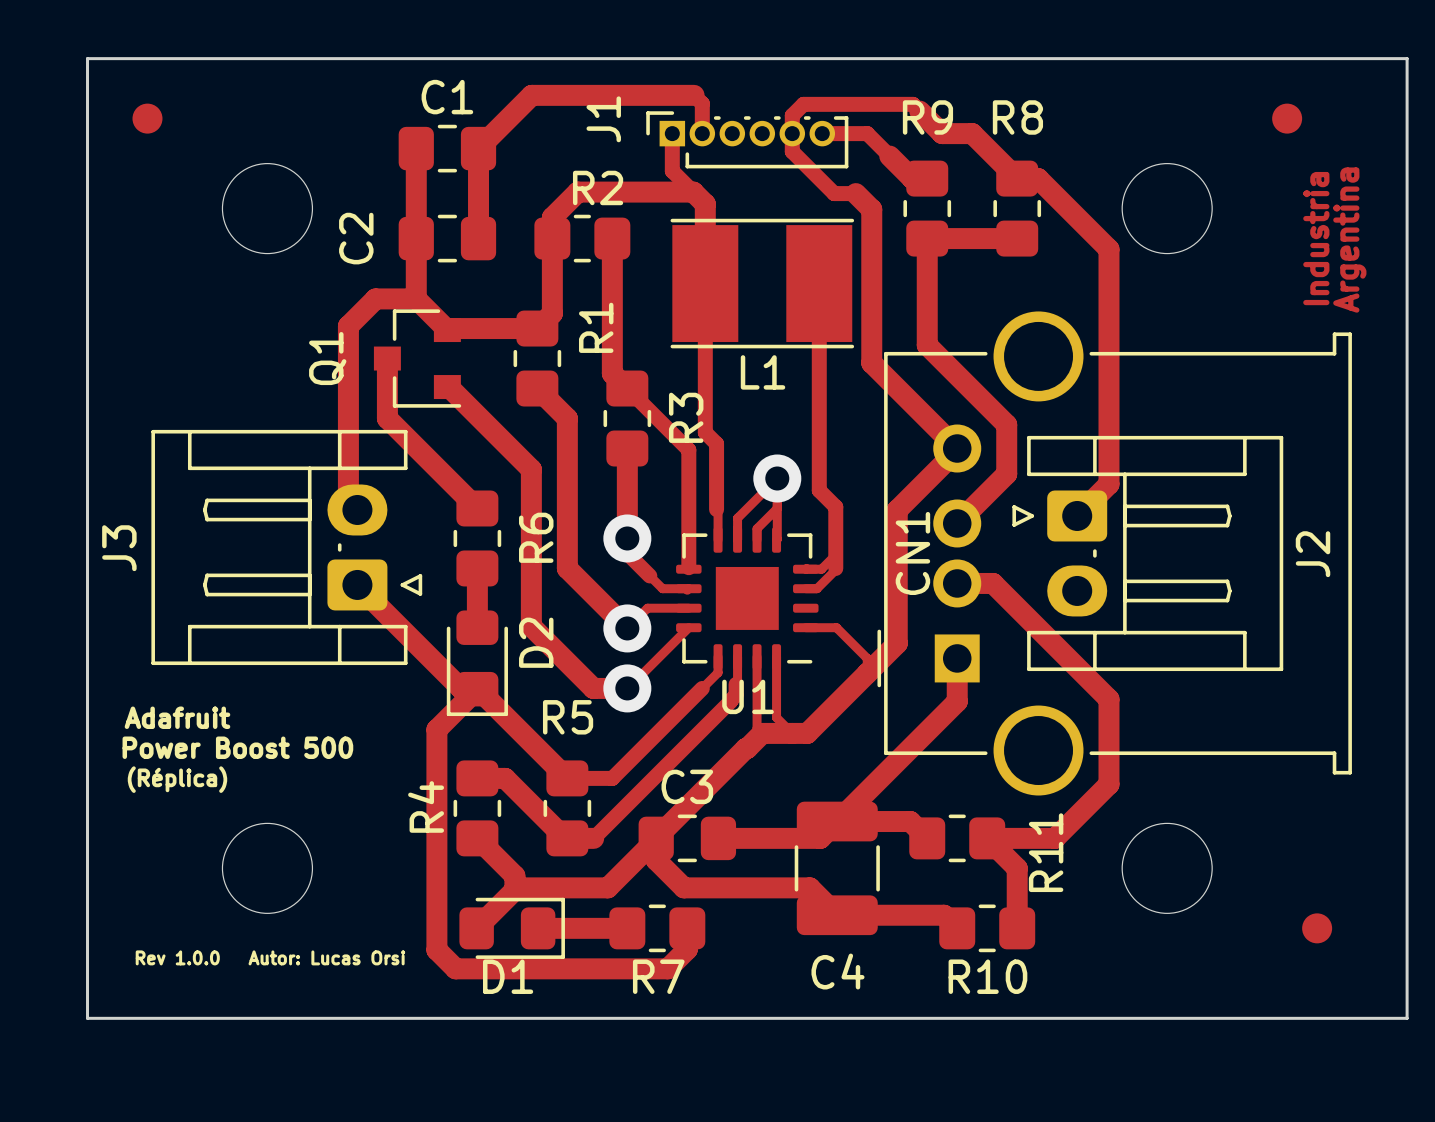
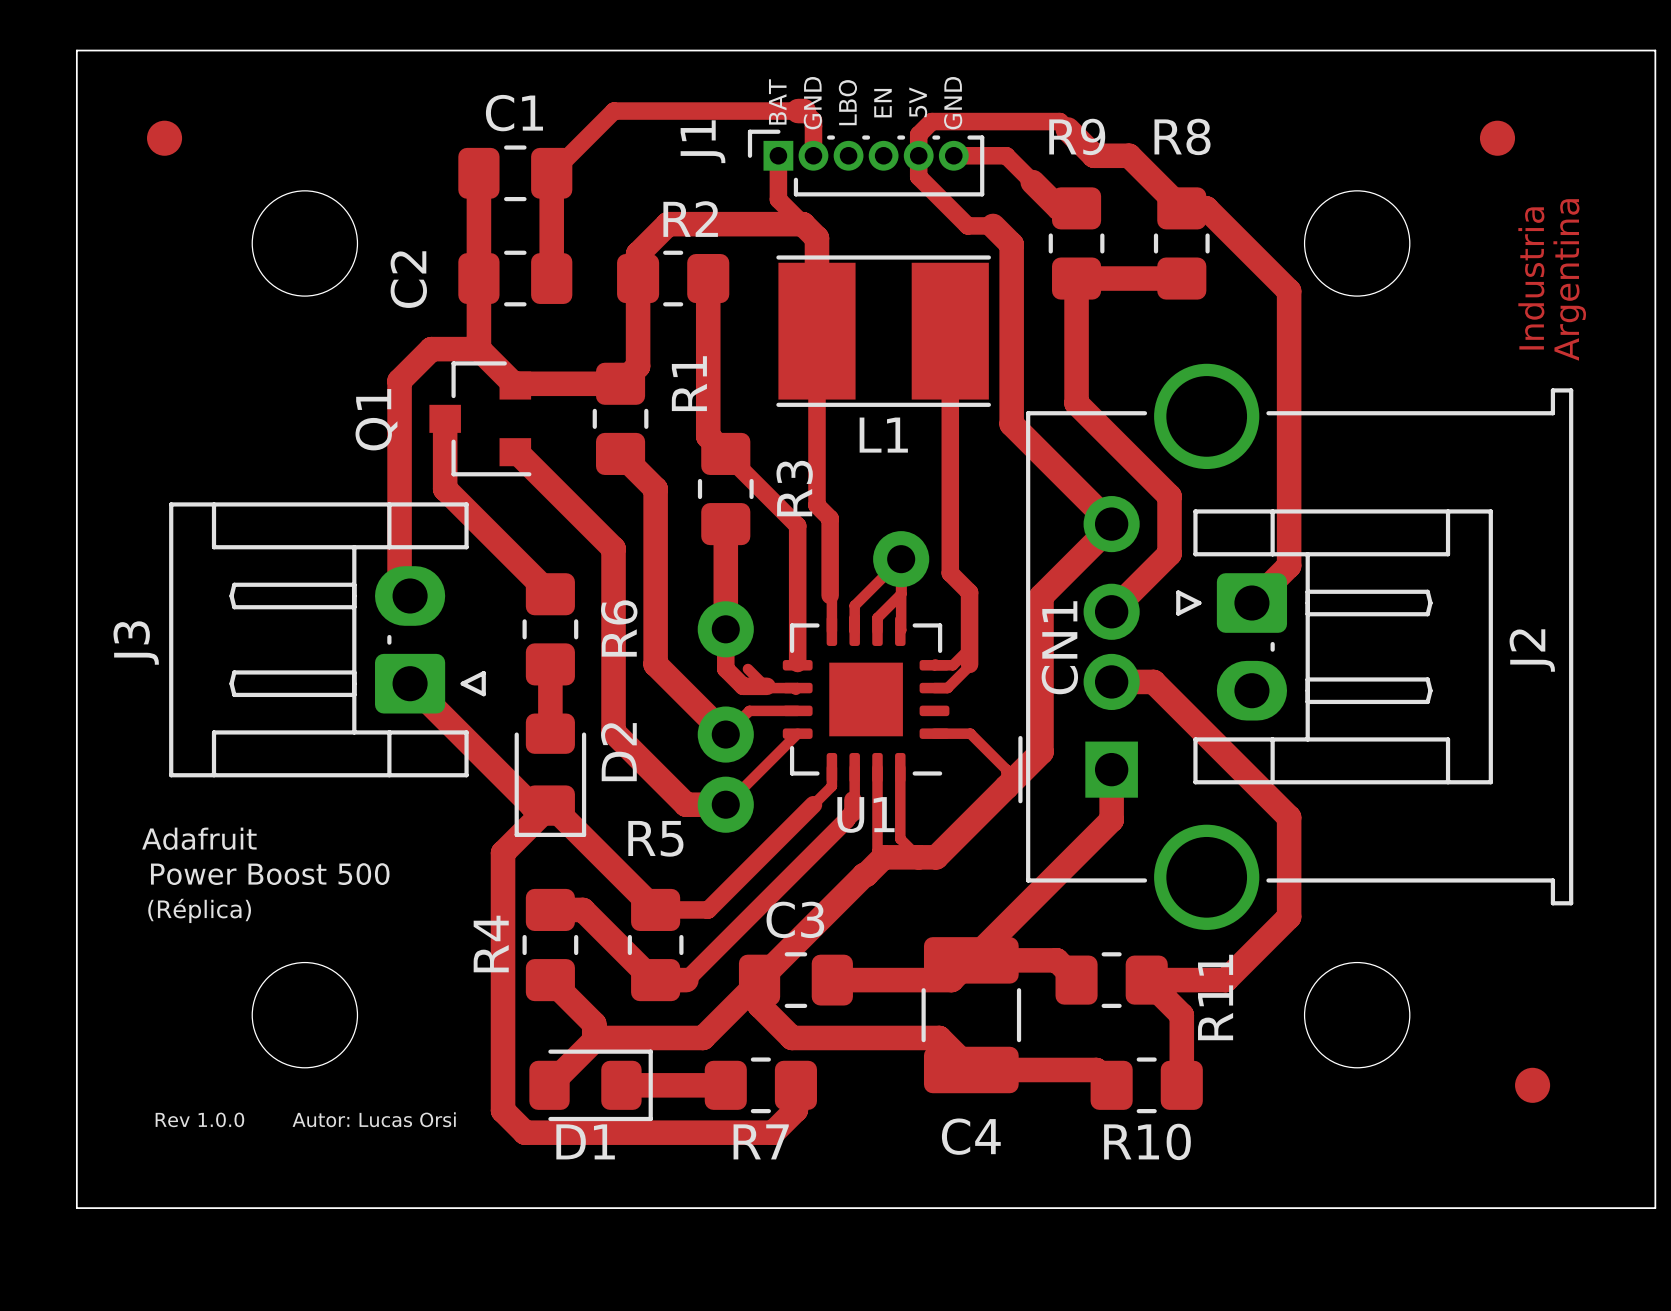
board edge: (87, 58) (1407, 58) (1407, 1018) (87, 1018) (87, 58) -> (76, 50) (76, 1208) (1655, 1208) (1655, 50) (76, 50)
text: none -> BAT (777, 101)
text: none -> 5V (918, 102)
text: none -> GND (812, 103)
text: none -> LBO (847, 102)
text: none -> EN (882, 103)
text: none -> GND (953, 103)
track width: thick (689, 95) (531, 95) (478, 148) -> thin (798, 111) (613, 111) (551, 173)
track: (627, 553) (649, 575) -> (725, 646) (725, 669) (743, 686) (767, 686)

